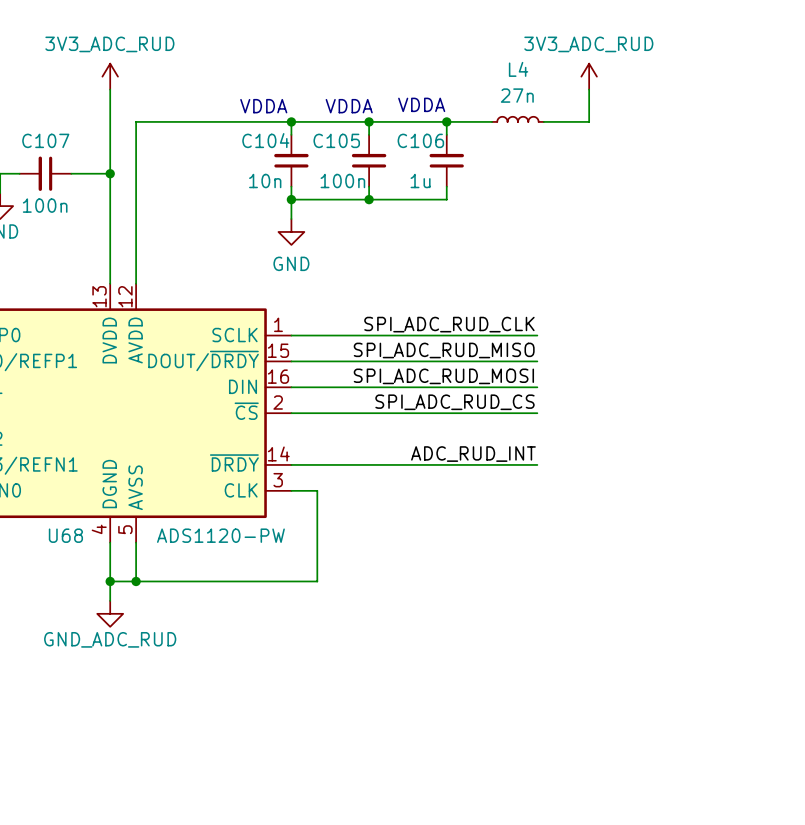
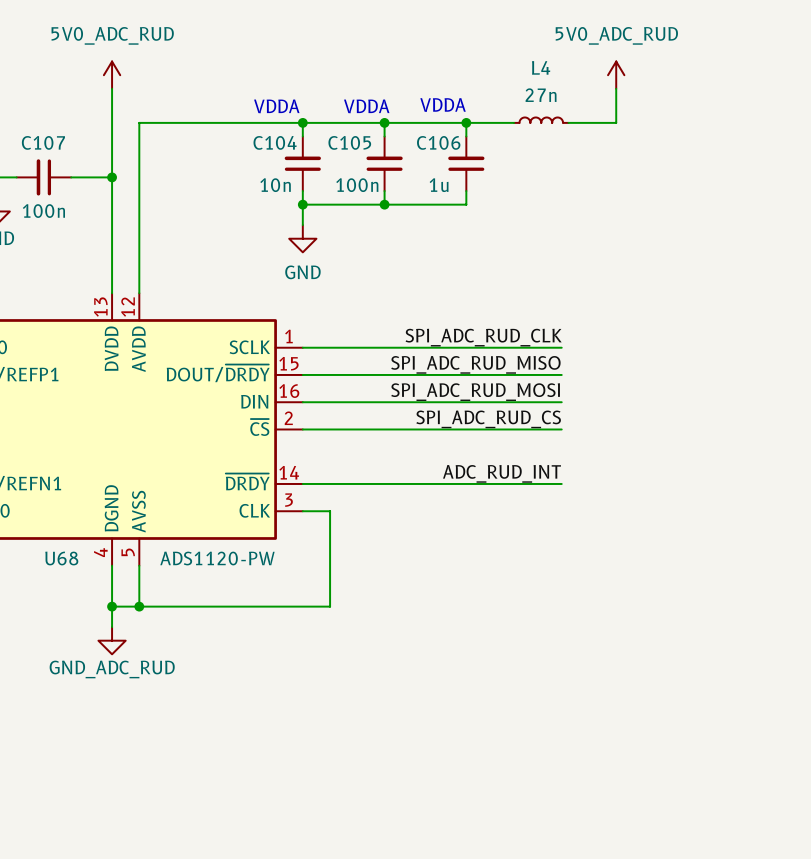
power symbol: 3V3_ADC_RUD (110, 76) -> 5V0_ADC_RUD (112, 75)
power symbol: 3V3_ADC_RUD (589, 76) -> 5V0_ADC_RUD (616, 75)

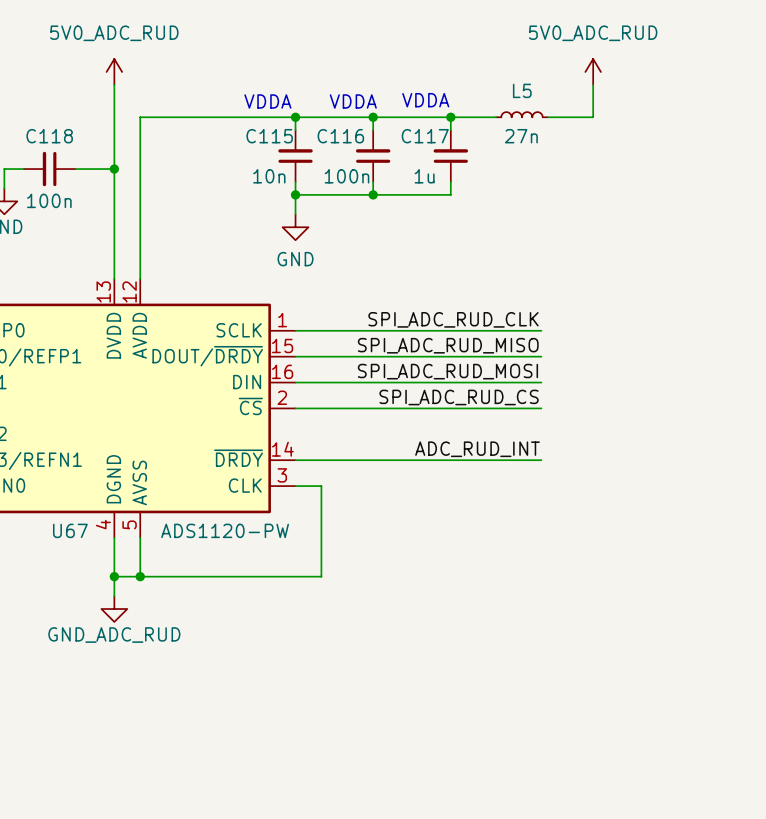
L4 name: L4 (541, 67) -> L5 (522, 90)
L4 value position: 27n (541, 95) -> 27n (521, 136)
C107 name: C107 (43, 142) -> C118 (49, 136)
C104 name: C104 (275, 142) -> C115 (269, 136)
C105 name: C105 (349, 142) -> C116 (340, 136)
C106 name: C106 (438, 142) -> C117 (425, 136)
U68 name: U68 (61, 558) -> U67 (70, 530)

